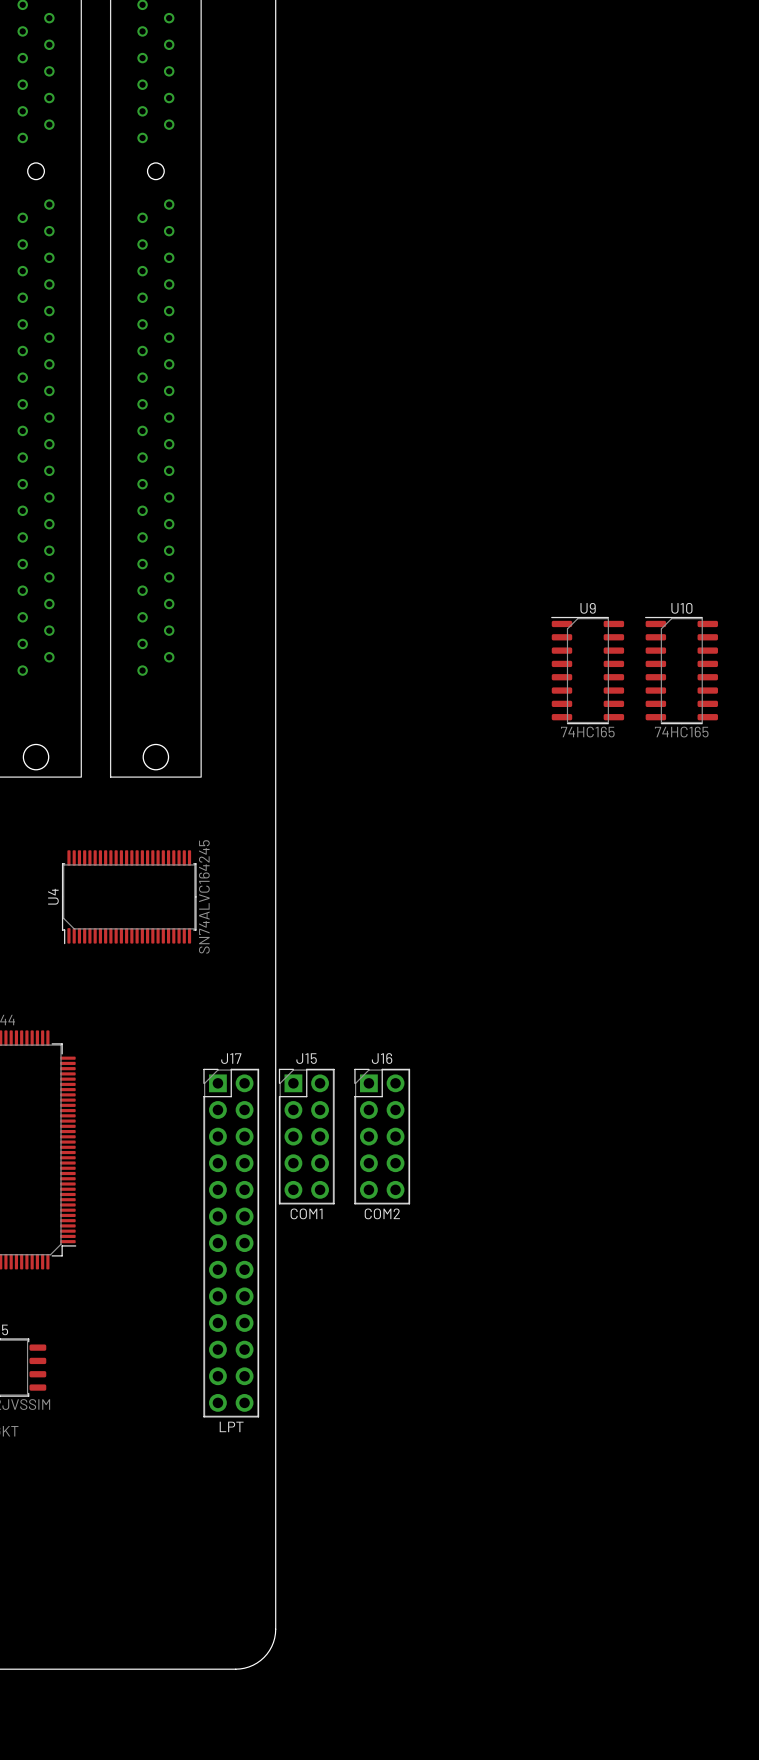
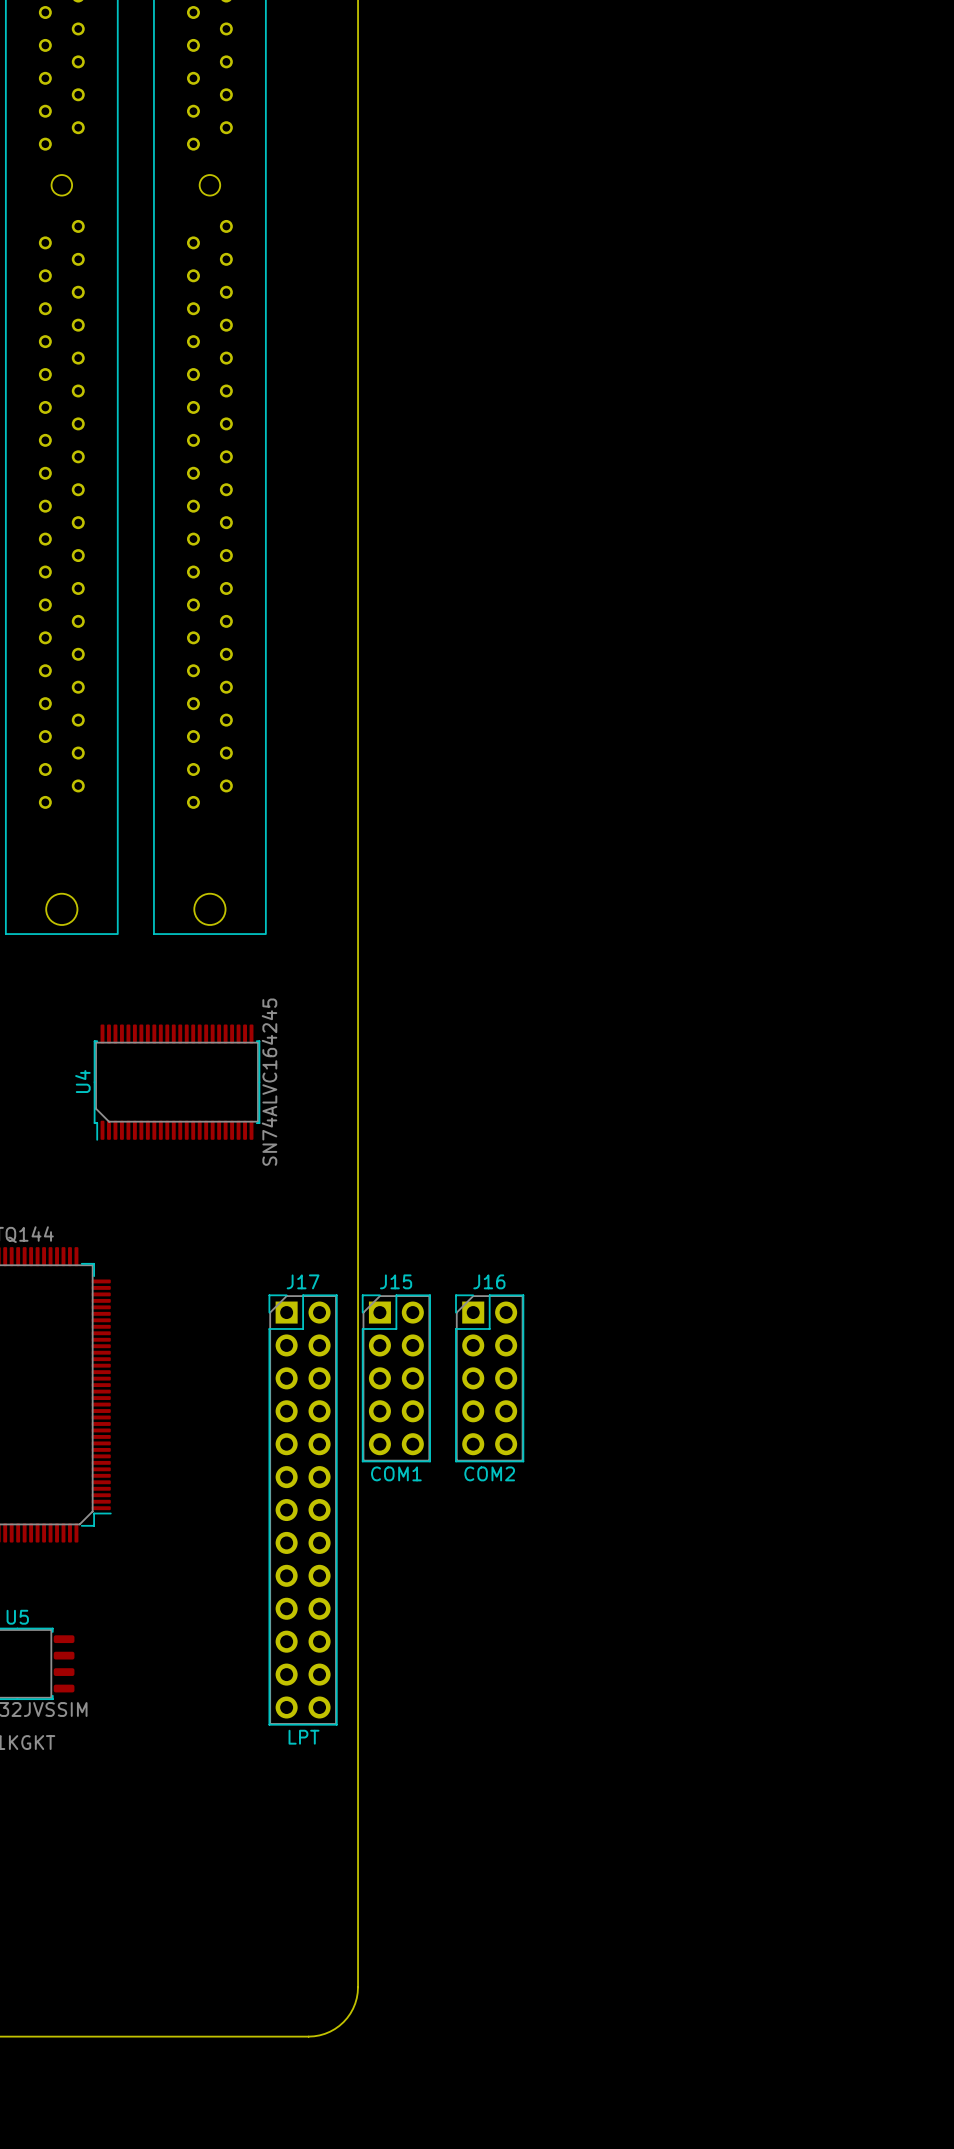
U9: 74HC165 (587, 670) -> none
U10: 74HC165 (681, 670) -> none

